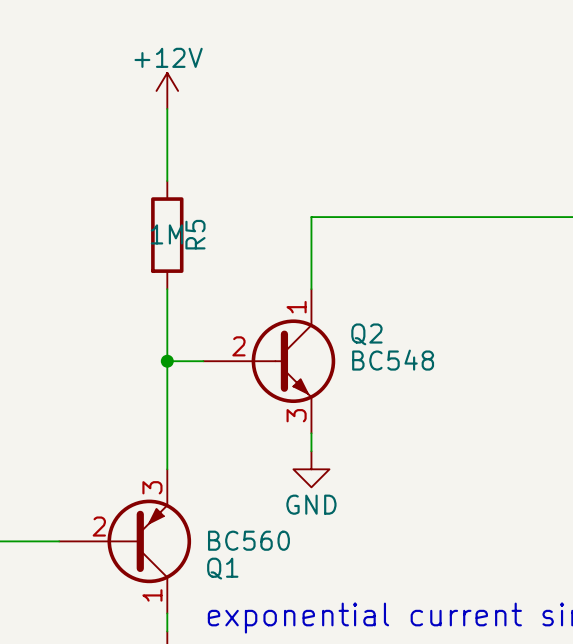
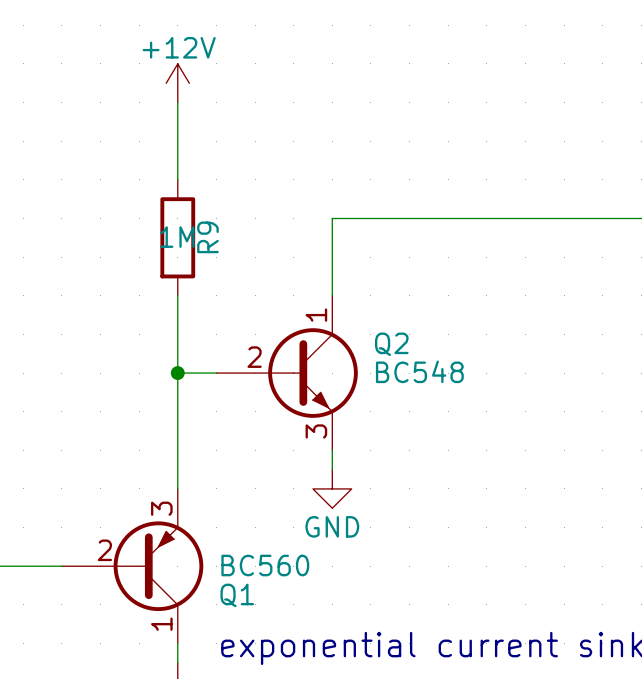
R5 name: R5 (195, 234) -> R9 (207, 237)

